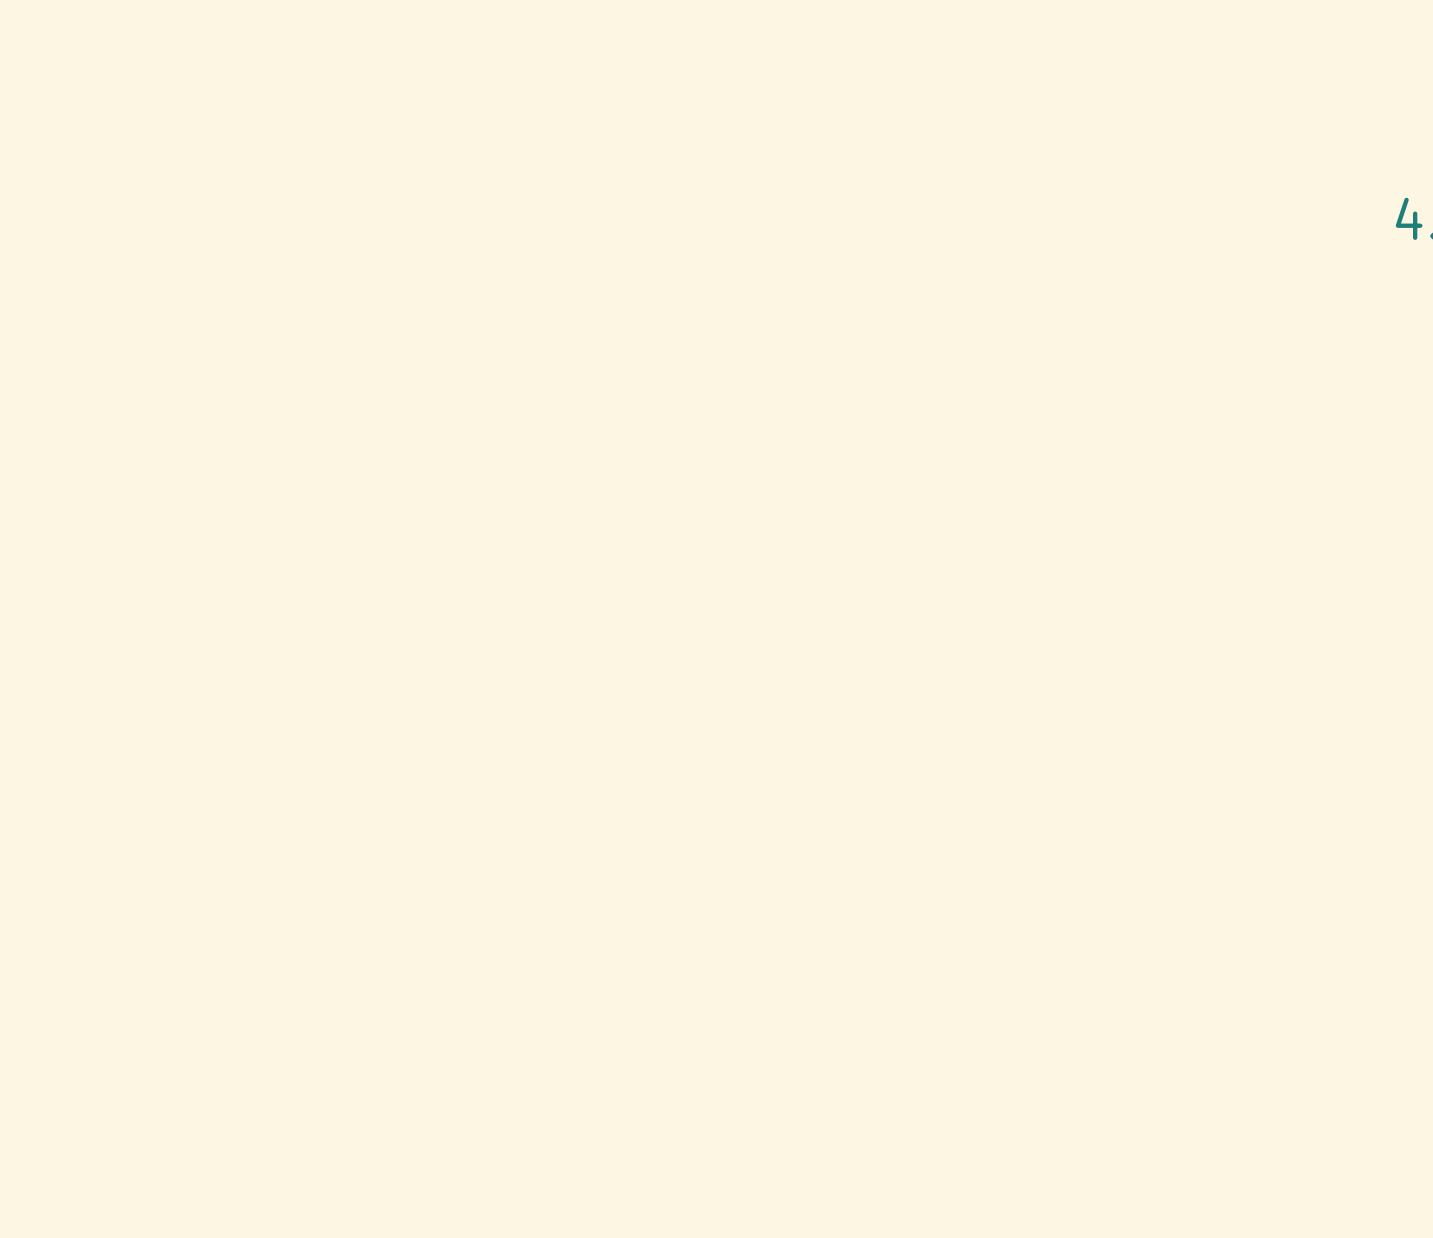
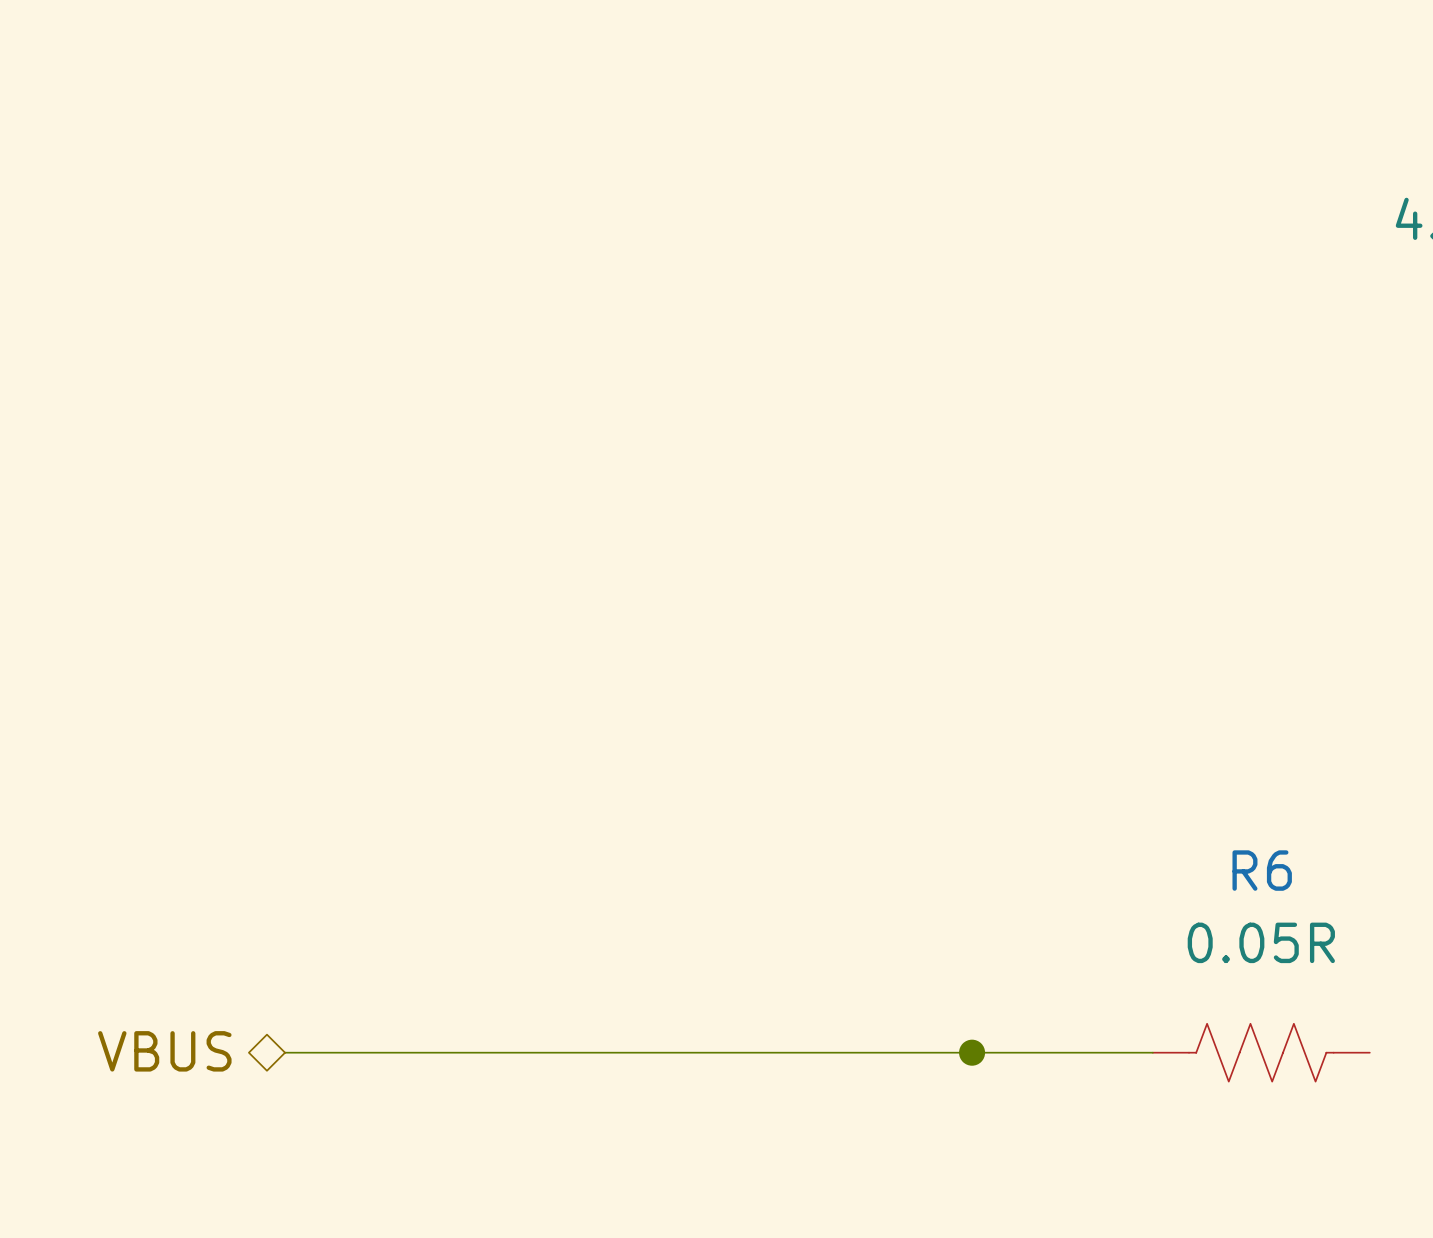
hierarchical label: none -> VBUS (164, 1051)
wire: none -> (285, 1052) (1152, 1052)
junction: none -> (972, 1052)
R6: none -> 0.05R (1261, 1052)

